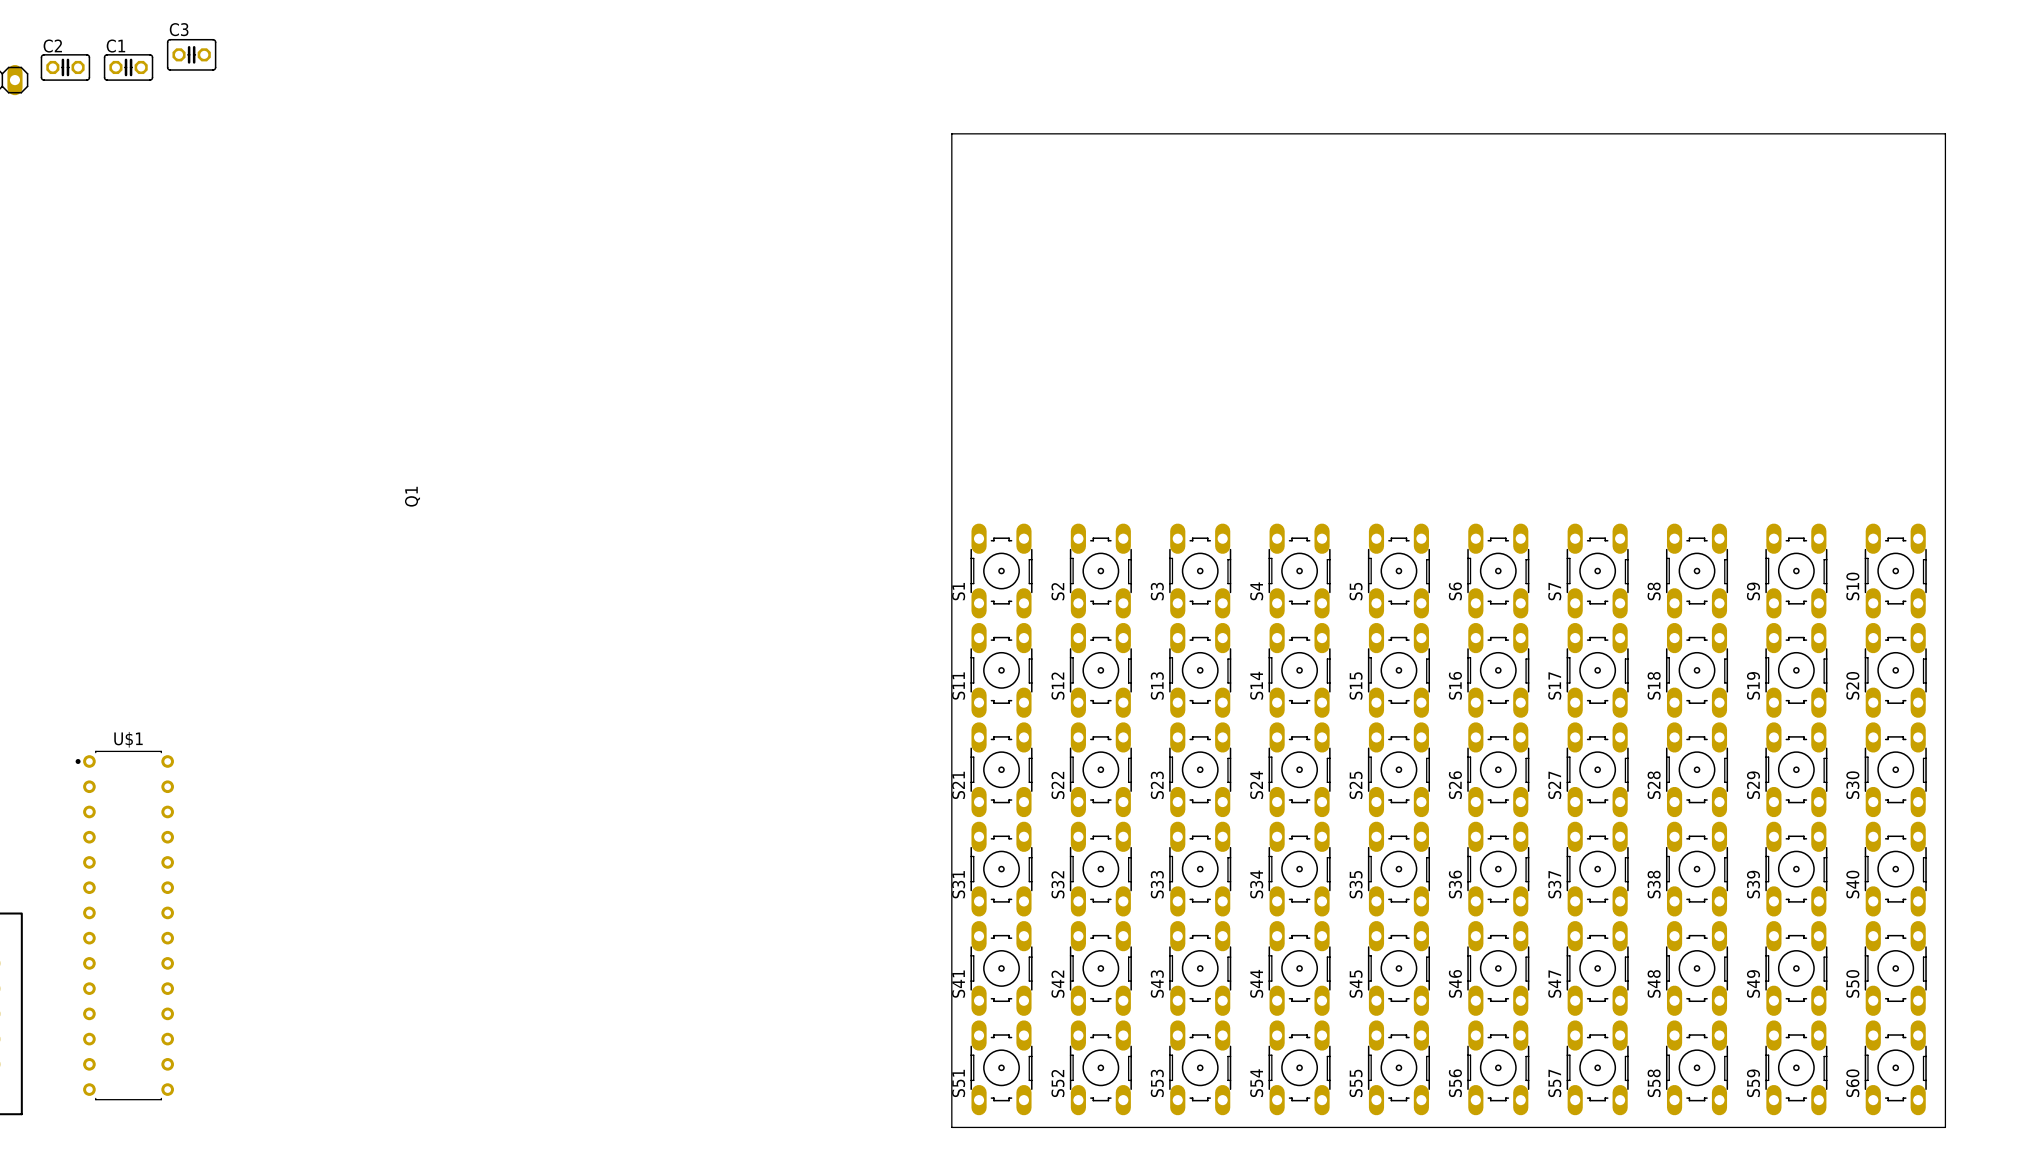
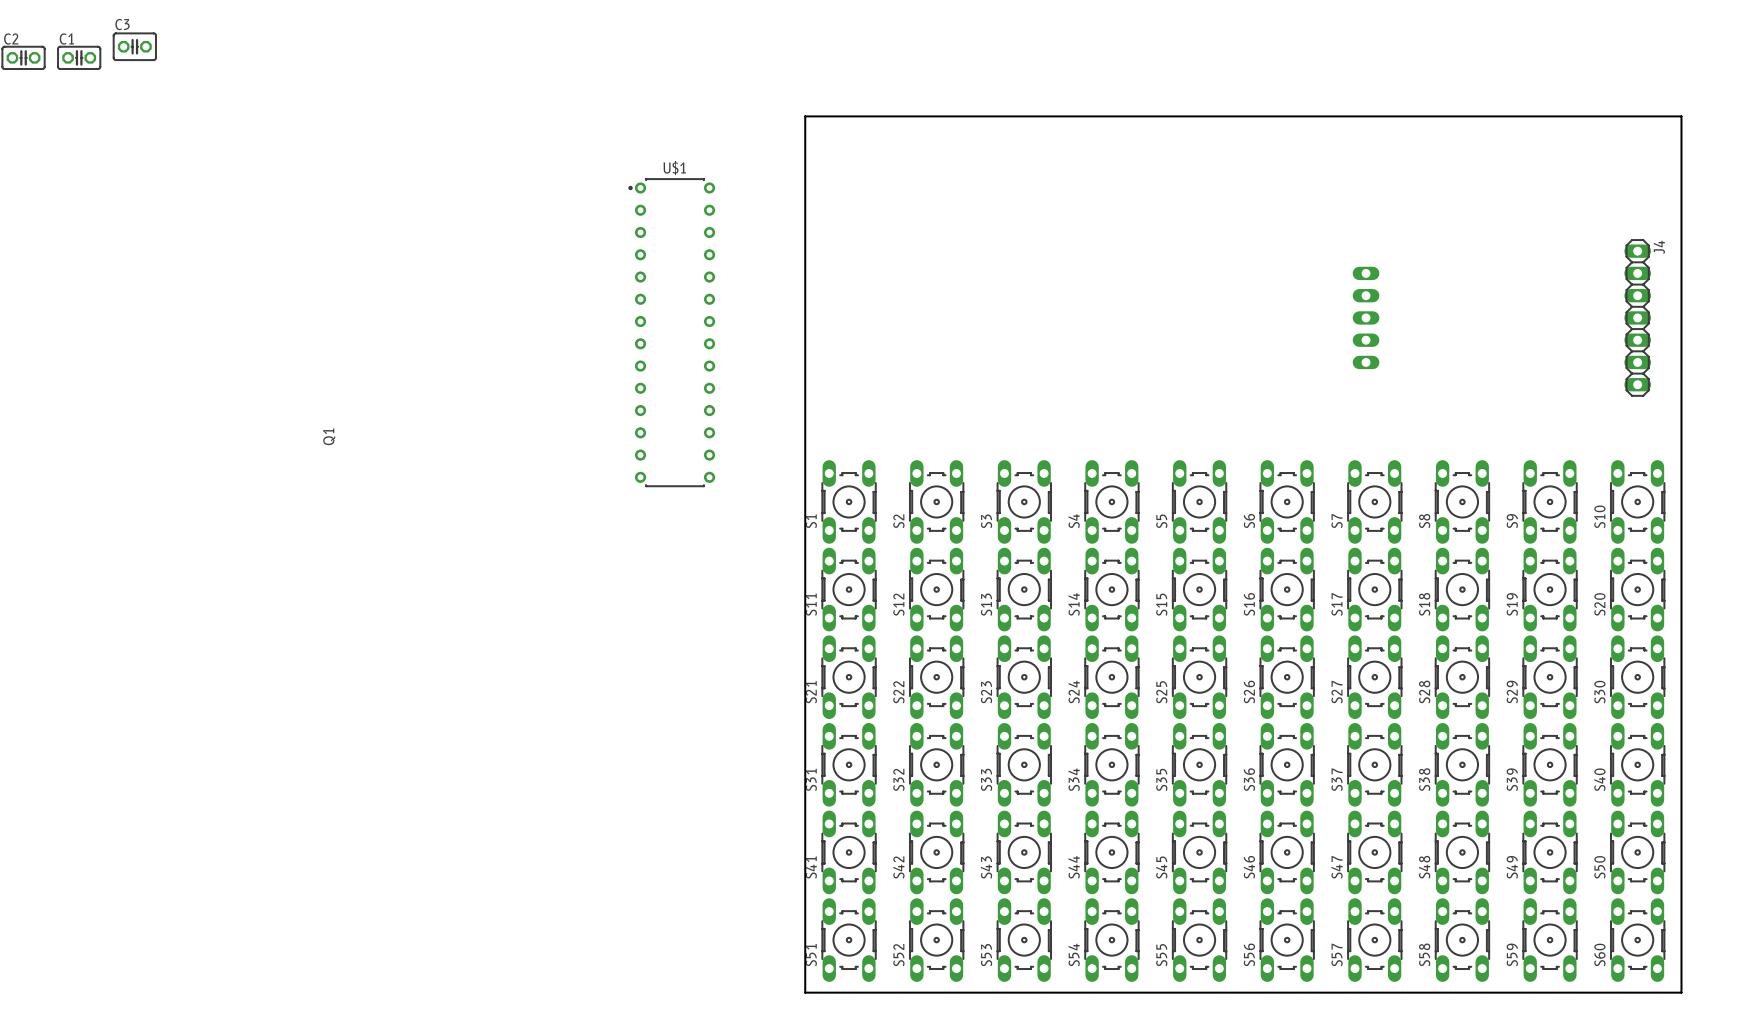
part: none -> (1366, 317)
J4: none -> (1637, 317)
U$1 position: (124, 925) -> (671, 332)

